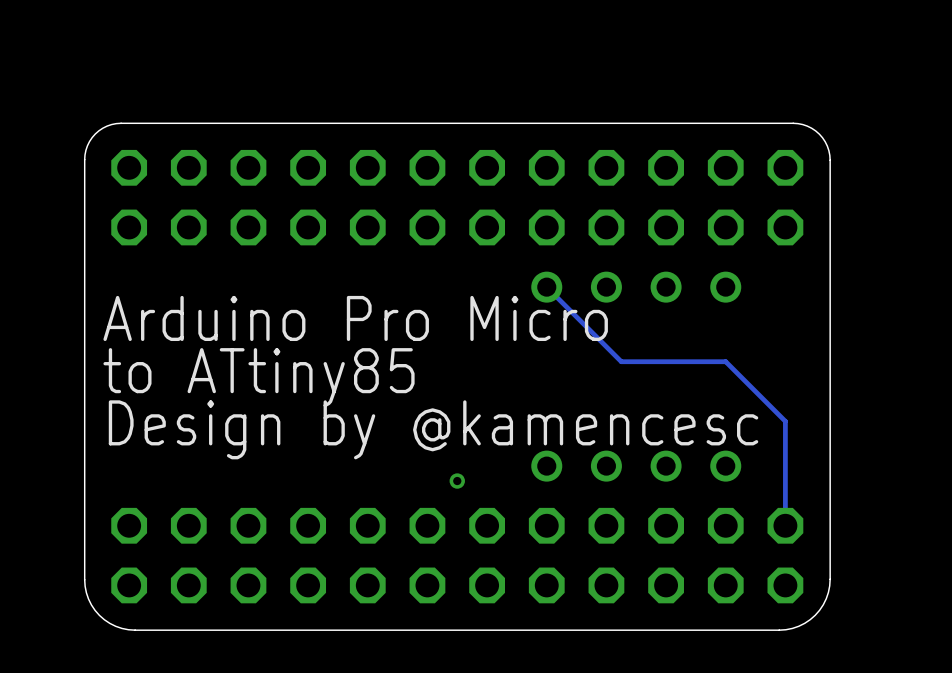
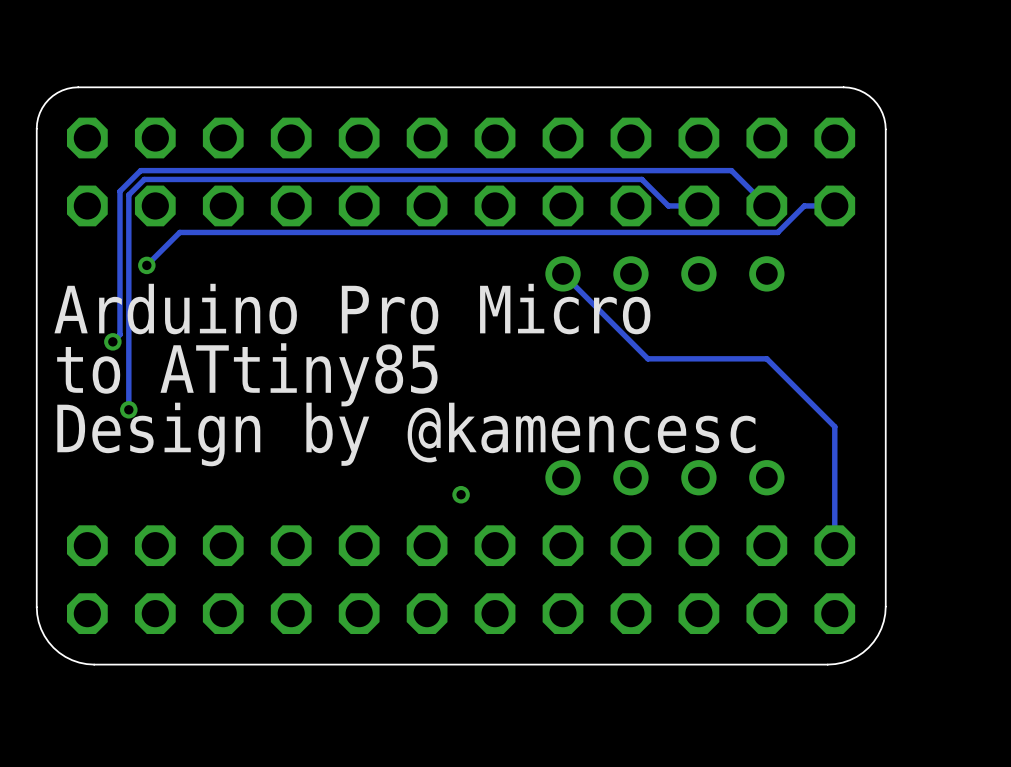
track: none -> (698, 205) (668, 205) (641, 179) (144, 179) (128, 194) (128, 409)
track: none -> (766, 205) (731, 170) (140, 170) (119, 191) (119, 334) (112, 341)
track: none -> (834, 205) (804, 205) (777, 232) (179, 232) (146, 265)
via: none -> (146, 265)
via: none -> (112, 341)
via: none -> (128, 409)

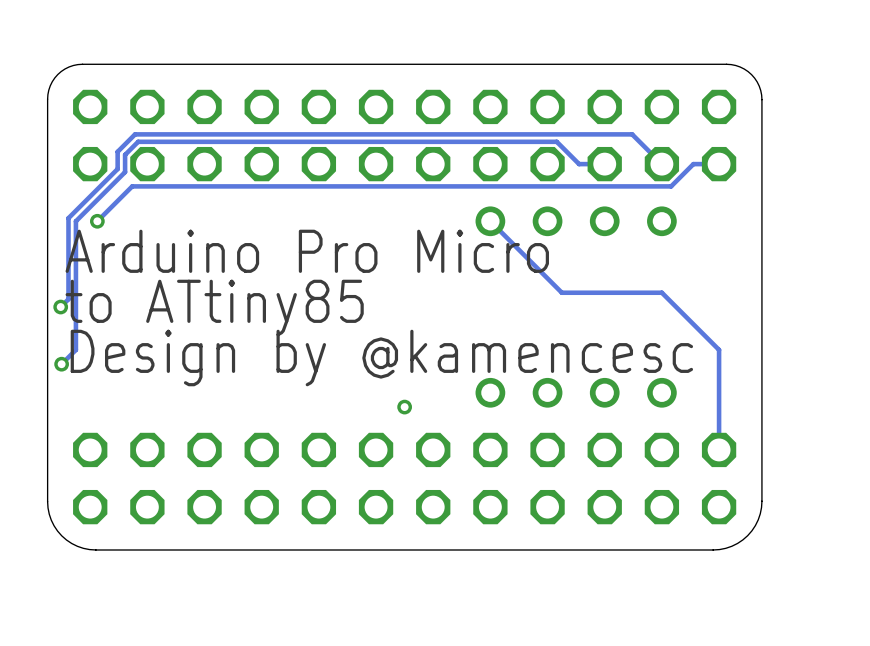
track: (119, 211) (119, 334) (112, 341) -> (117, 169) (68, 218) (68, 299) (60, 307)
track: (128, 215) (128, 409) -> (125, 172) (75, 221) (75, 349) (61, 364)
track: (179, 232) (146, 265) -> (167, 186) (132, 186) (97, 221)
via: (146, 265) -> none
via: none -> (97, 221)
via: (112, 341) -> none
via: none -> (60, 307)
via: (128, 409) -> none
via: none -> (61, 364)

